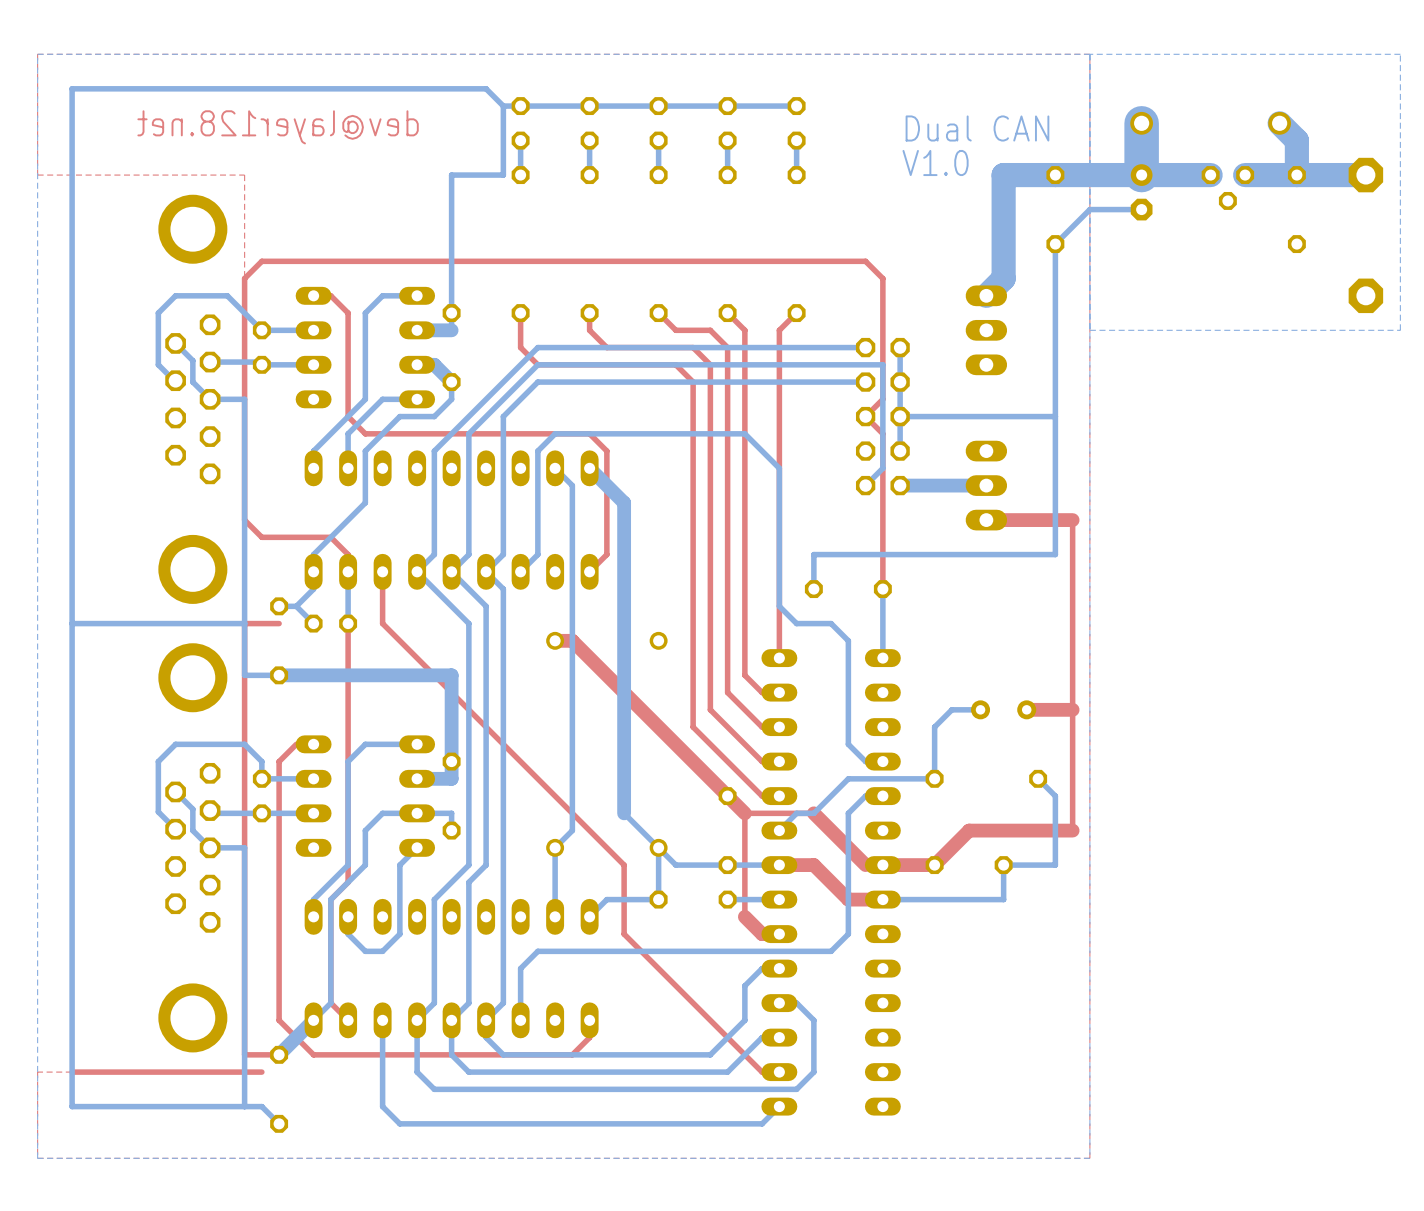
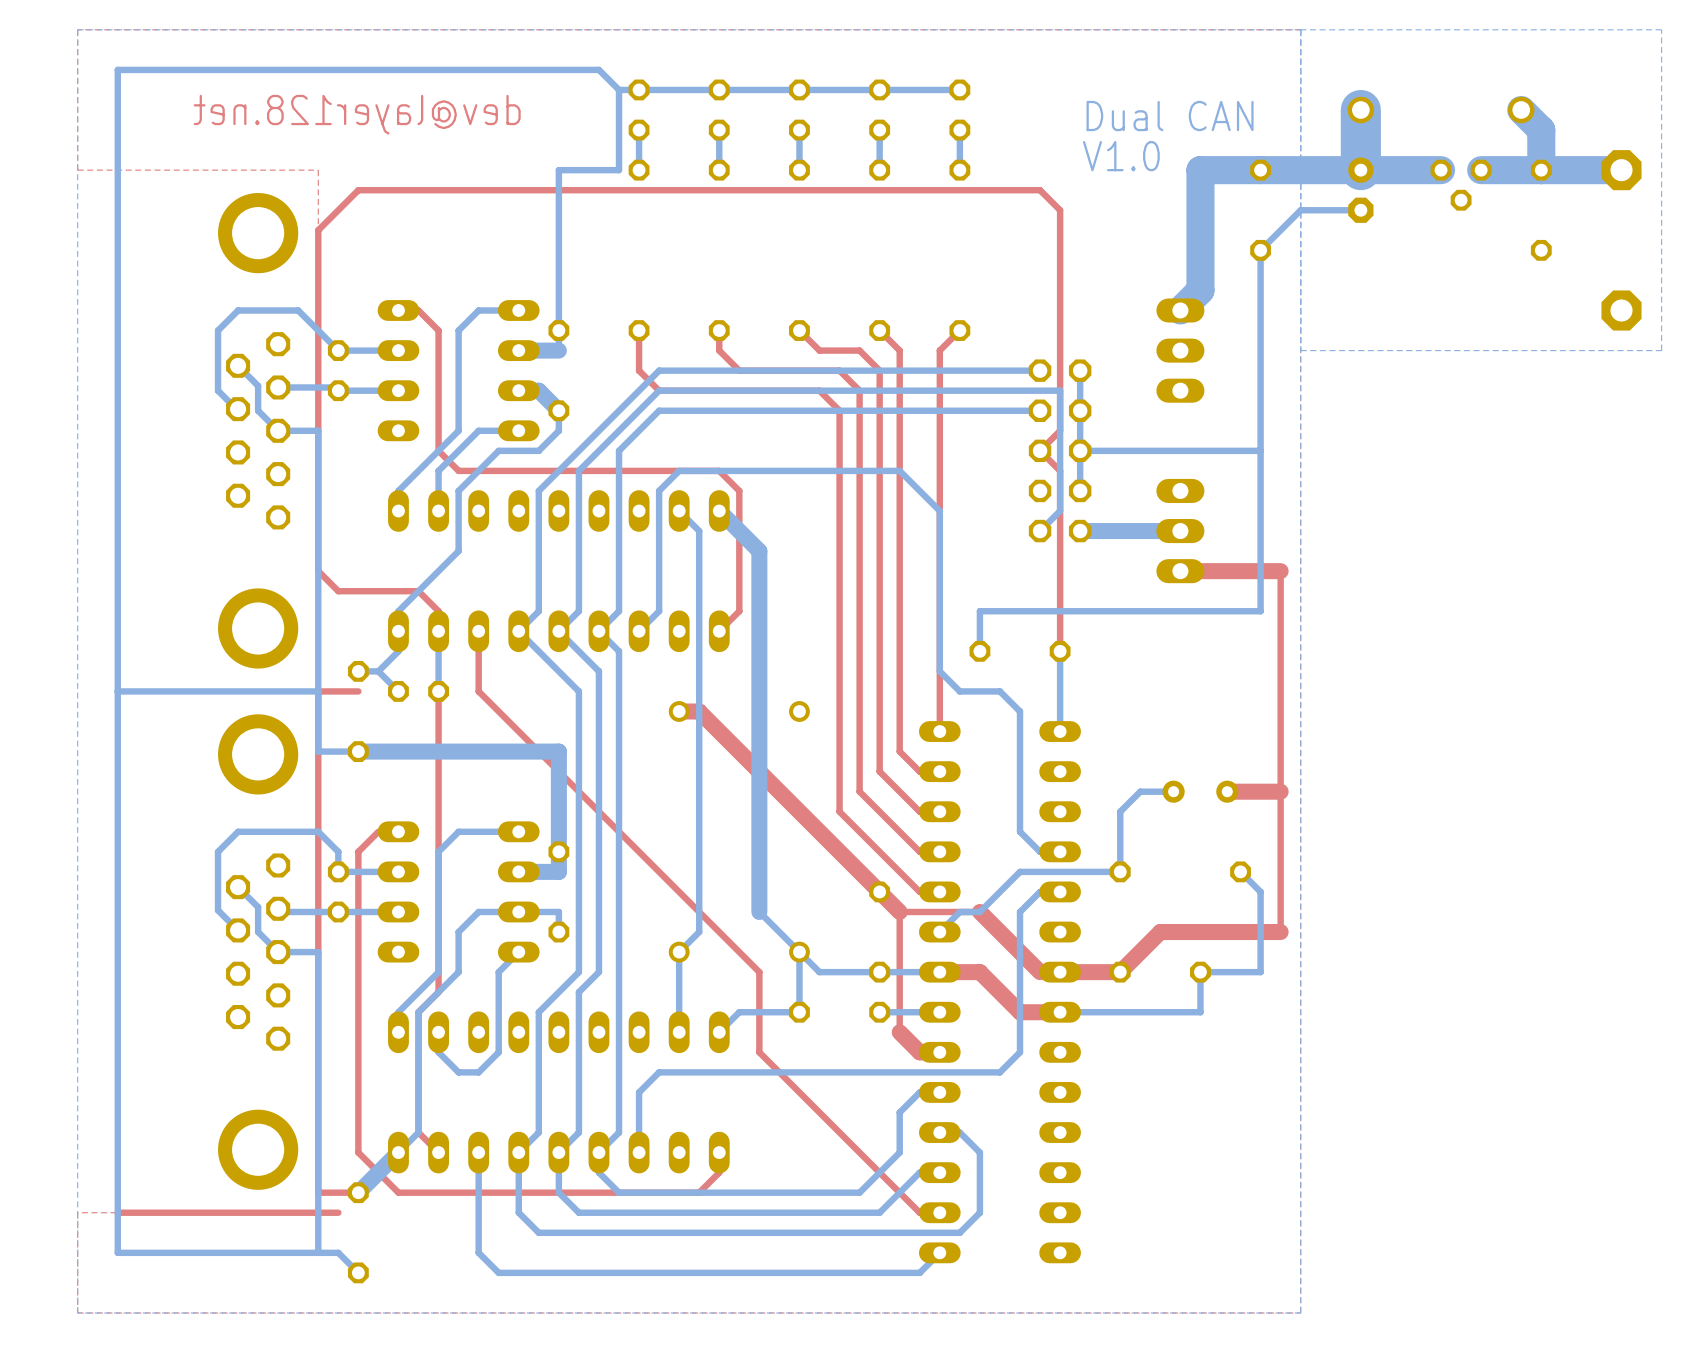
top track: (882, 278) (865, 261) (261, 261) (244, 278) -> (1060, 290) (1060, 210) (1040, 190) (358, 190) (318, 230) (318, 290)

